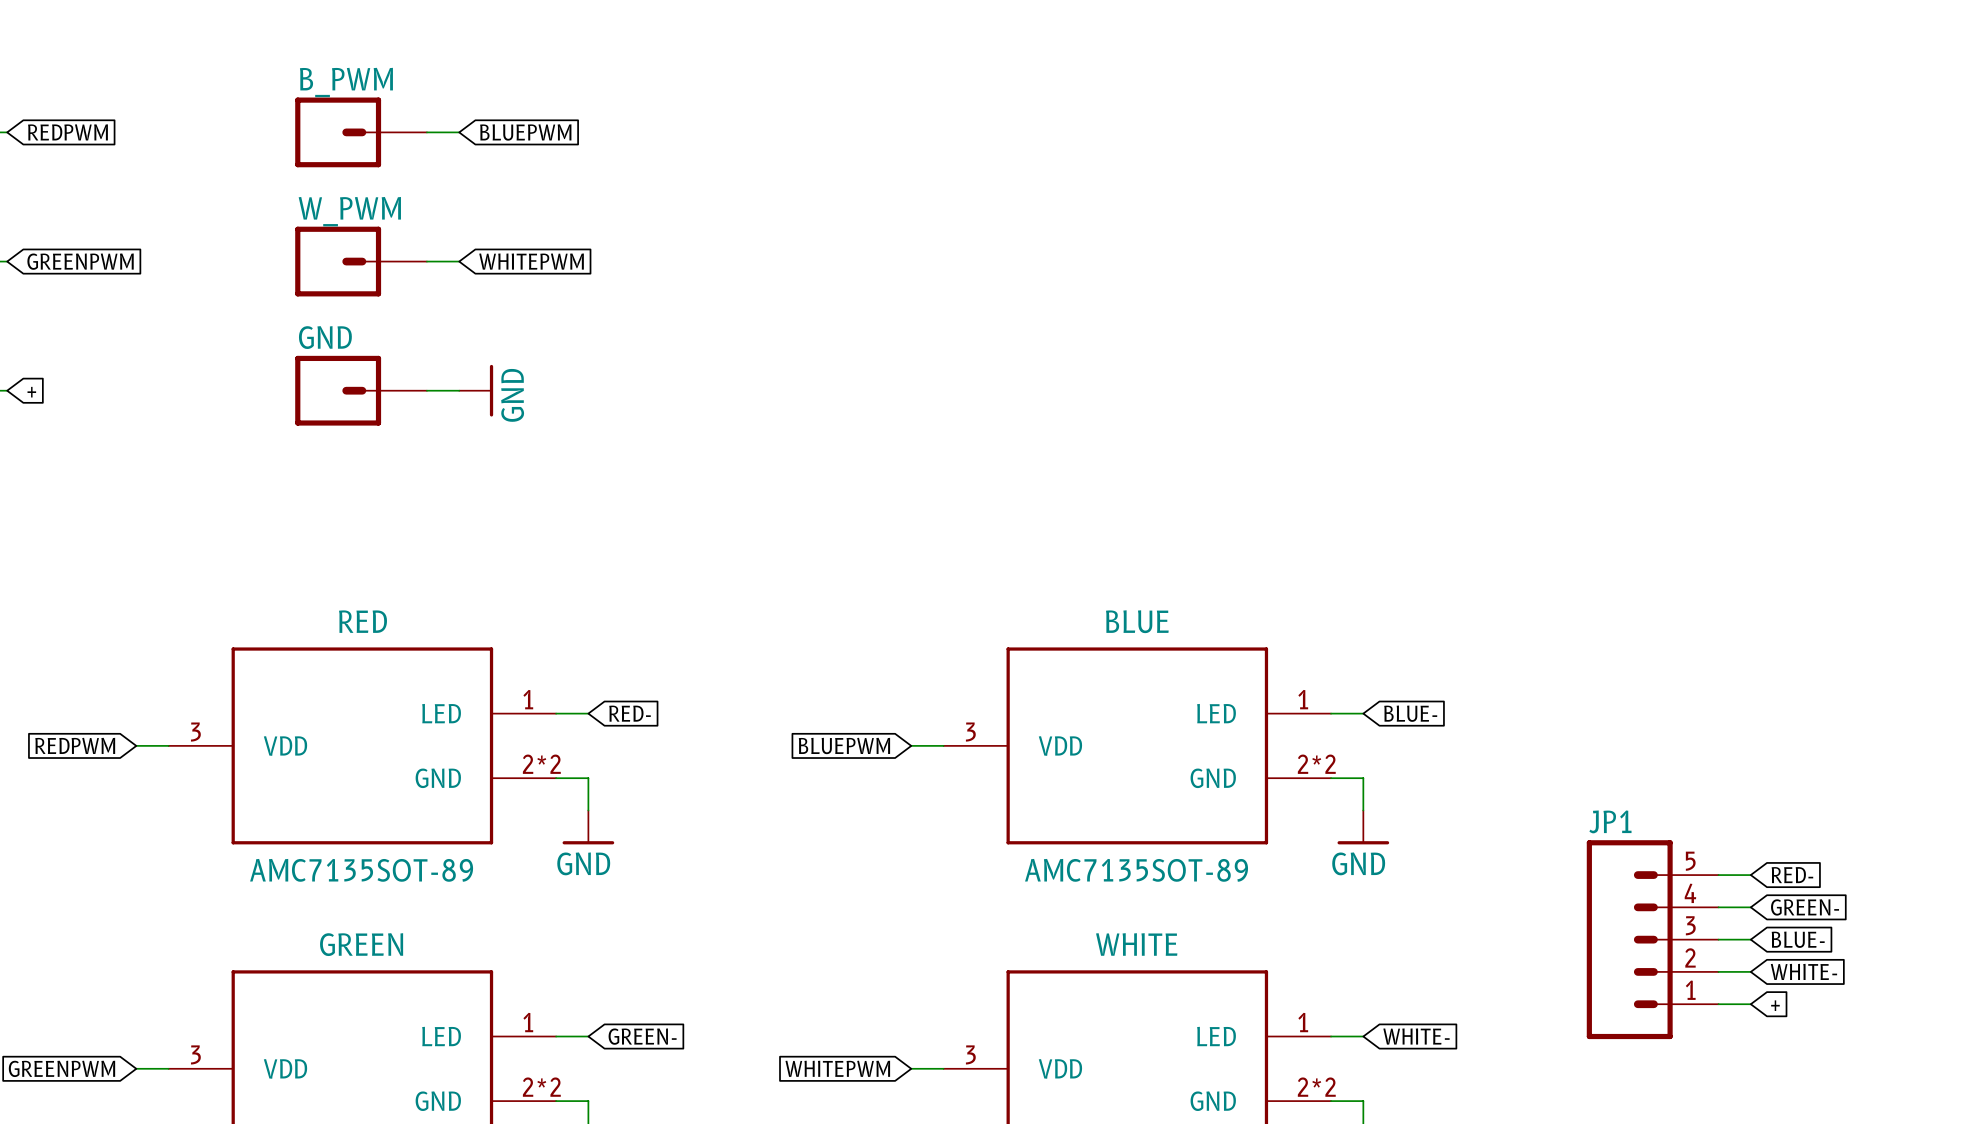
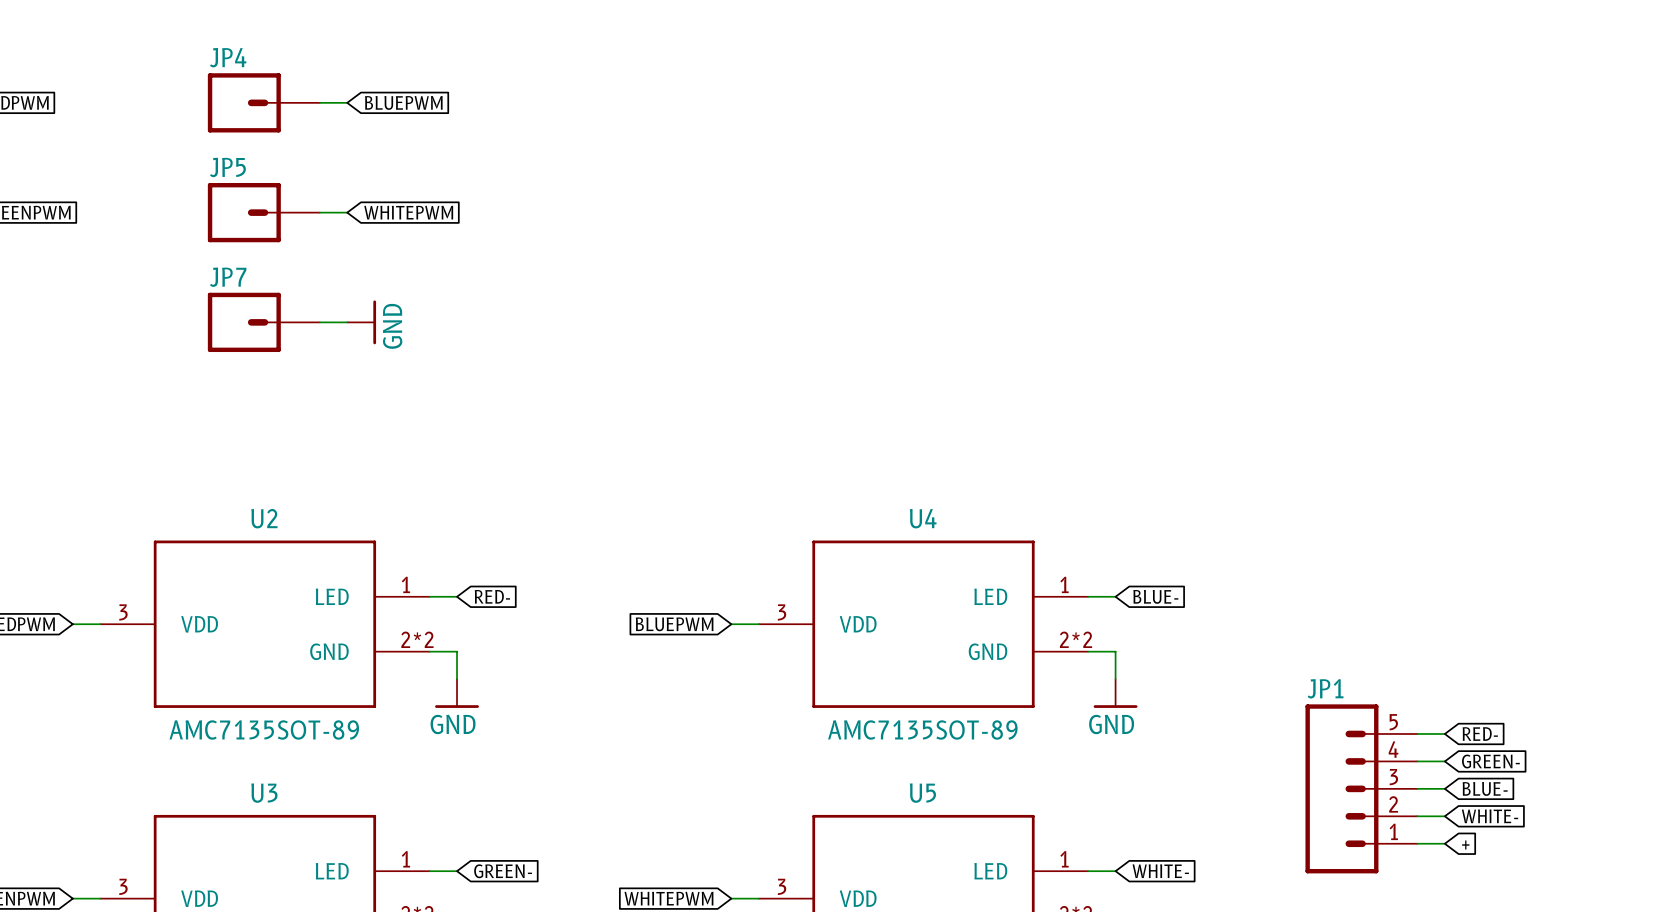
B_PWM name: B_PWM (346, 82) -> JP4 (228, 57)
W_PWM name: W_PWM (349, 211) -> JP5 (227, 167)
GND name: GND (325, 337) -> JP7 (228, 277)
RED name: RED (363, 621) -> U2 (264, 518)
BLUE name: BLUE (1137, 621) -> U4 (923, 518)
GREEN name: GREEN (361, 944) -> U3 (264, 793)
WHITE name: WHITE (1136, 944) -> U5 (922, 793)

